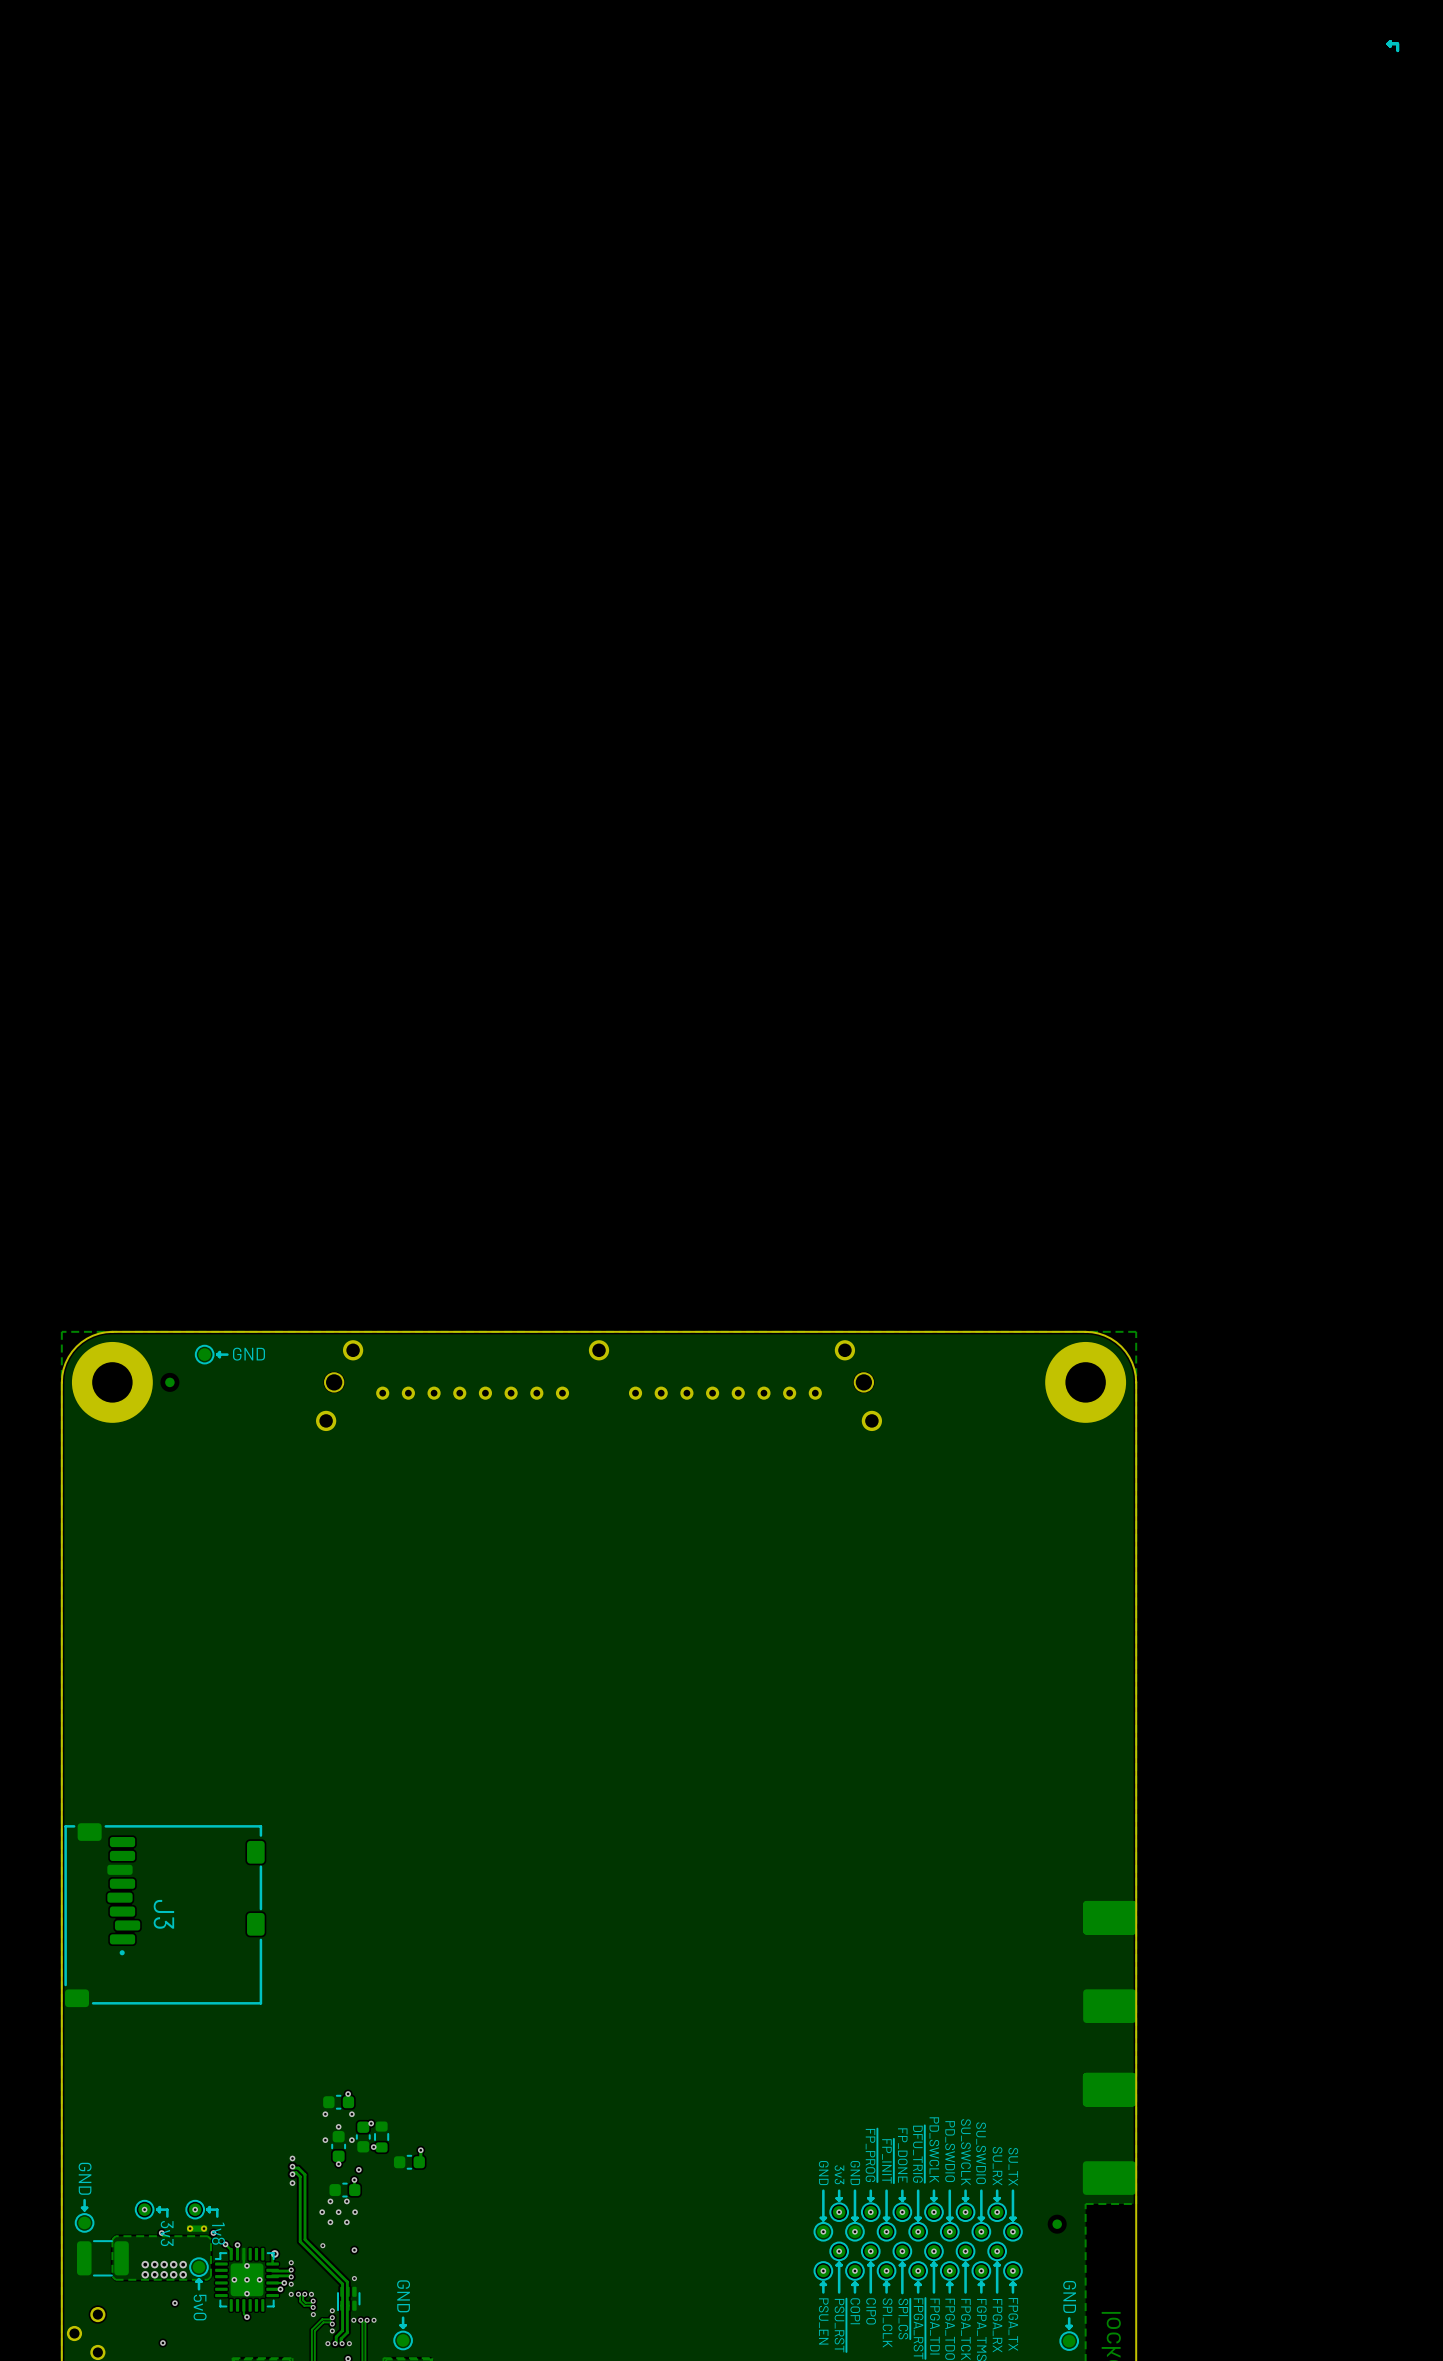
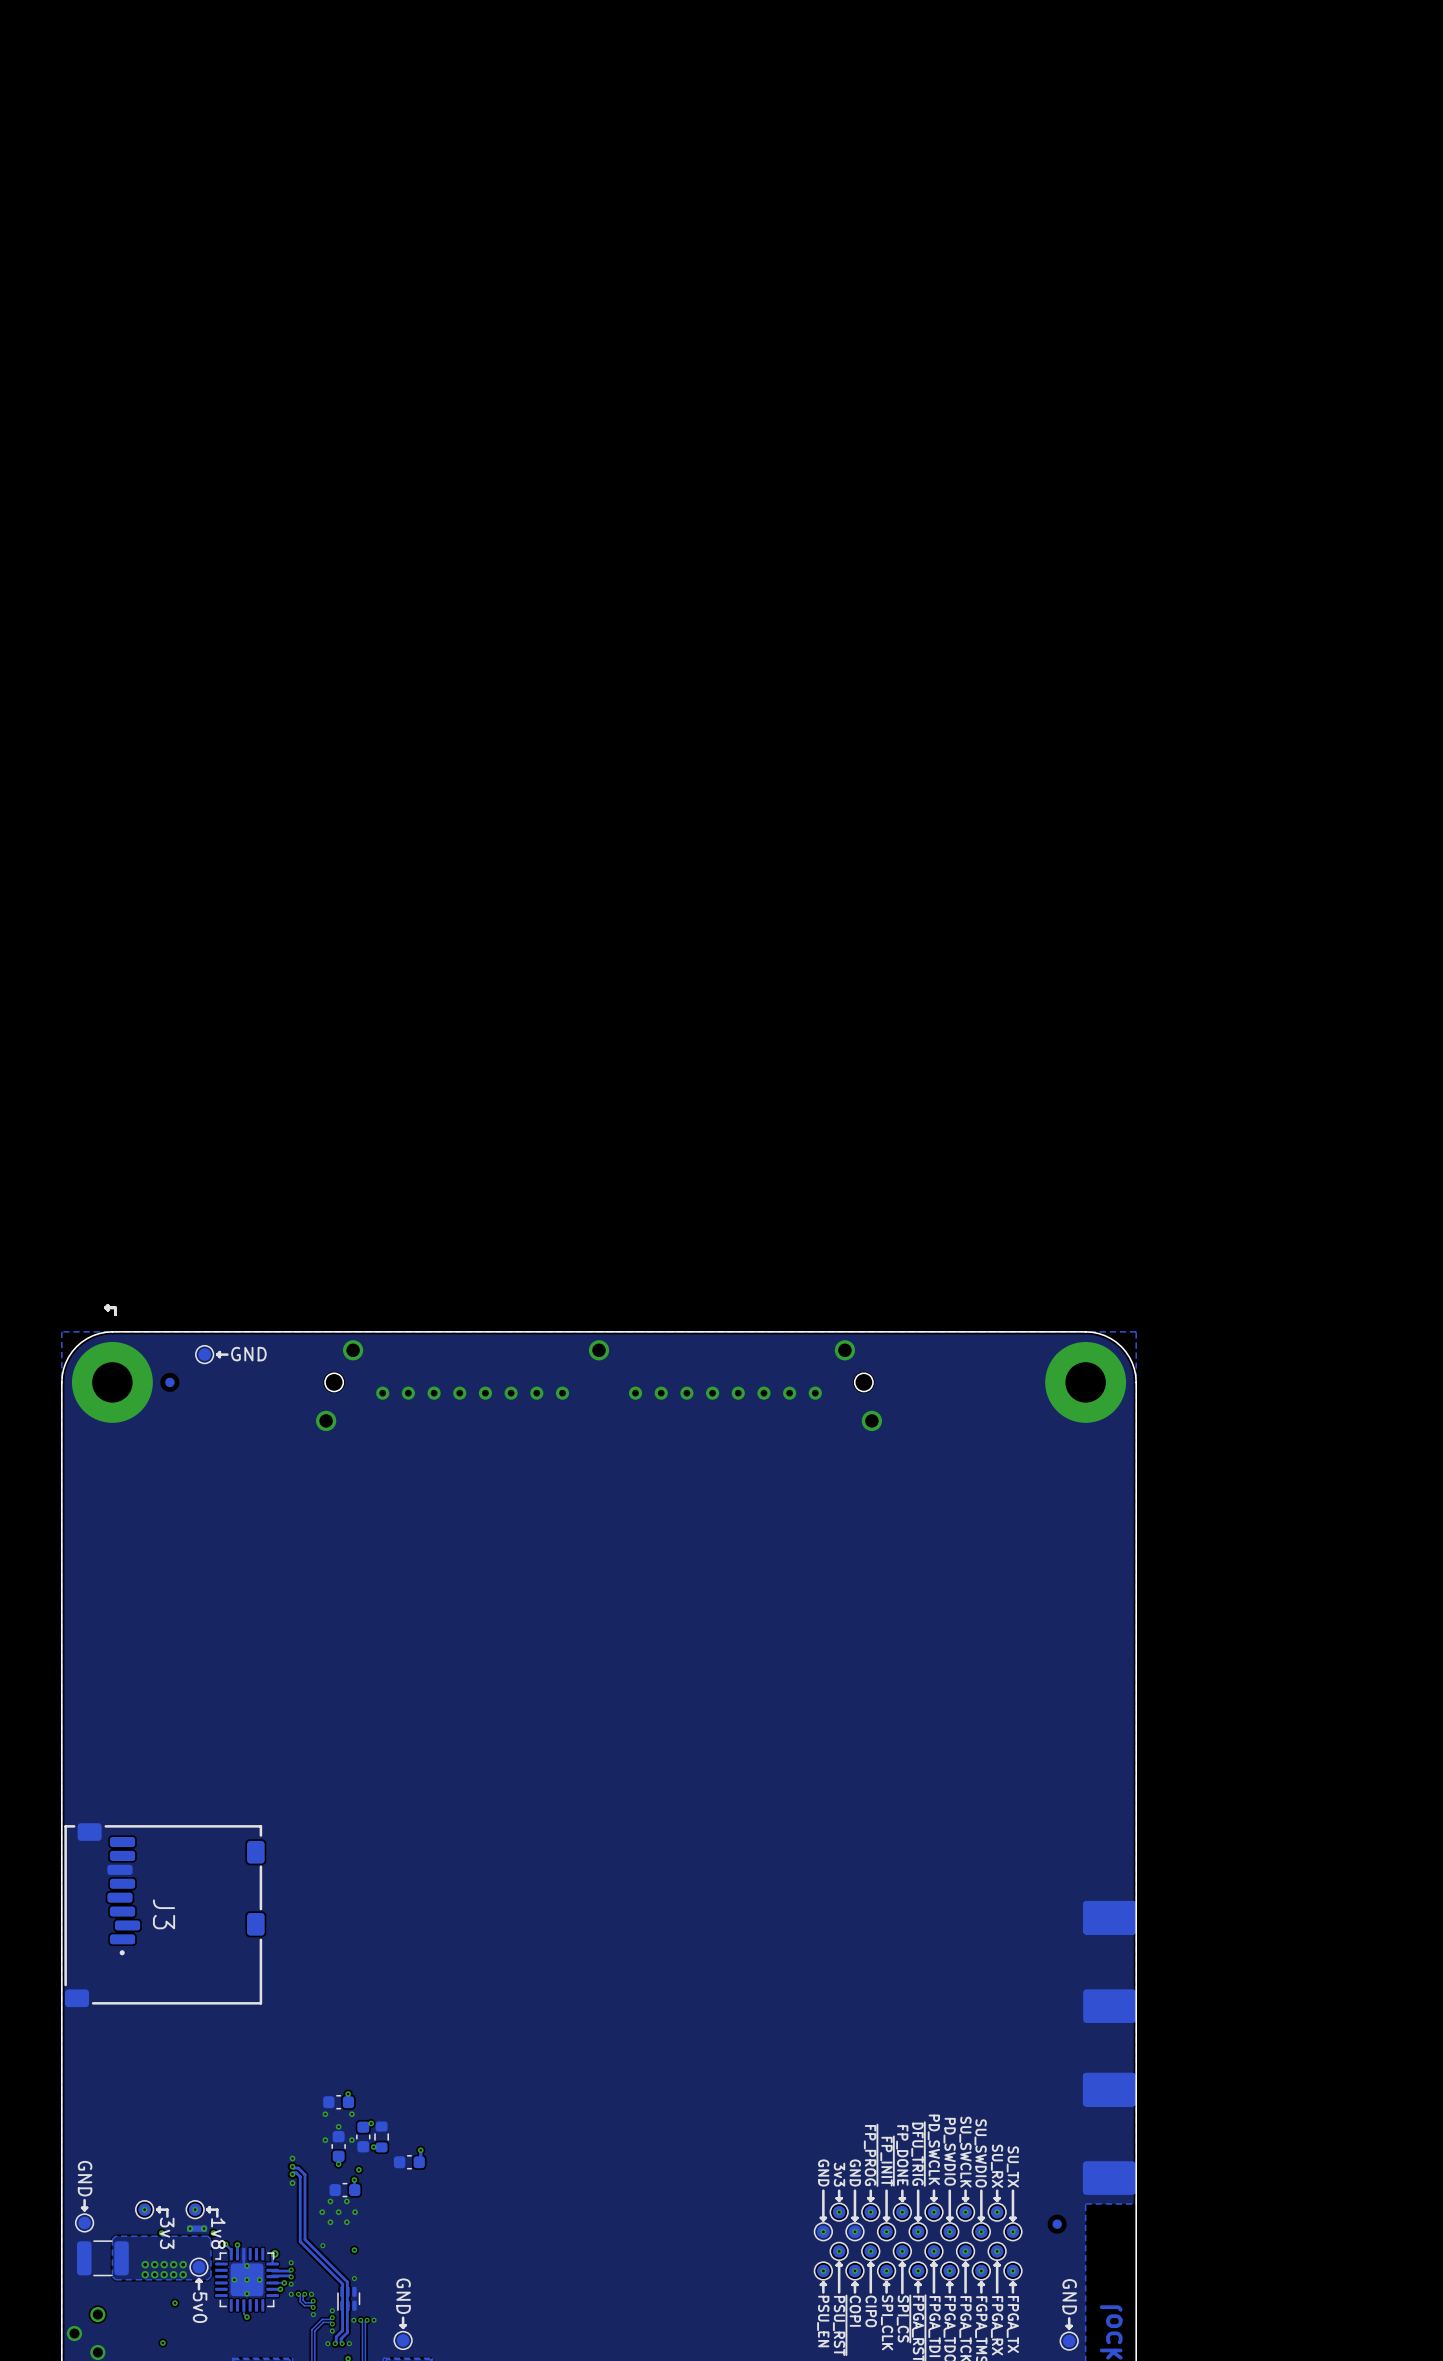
line: (1387, 43) (1390, 41) (1390, 46) (1387, 43) -> none
line: (1387, 43) (1397, 43) (1397, 50) -> none
line: none -> (105, 1307) (107, 1305) (107, 1310) (105, 1307)
line: none -> (105, 1307) (115, 1307) (115, 1314)

